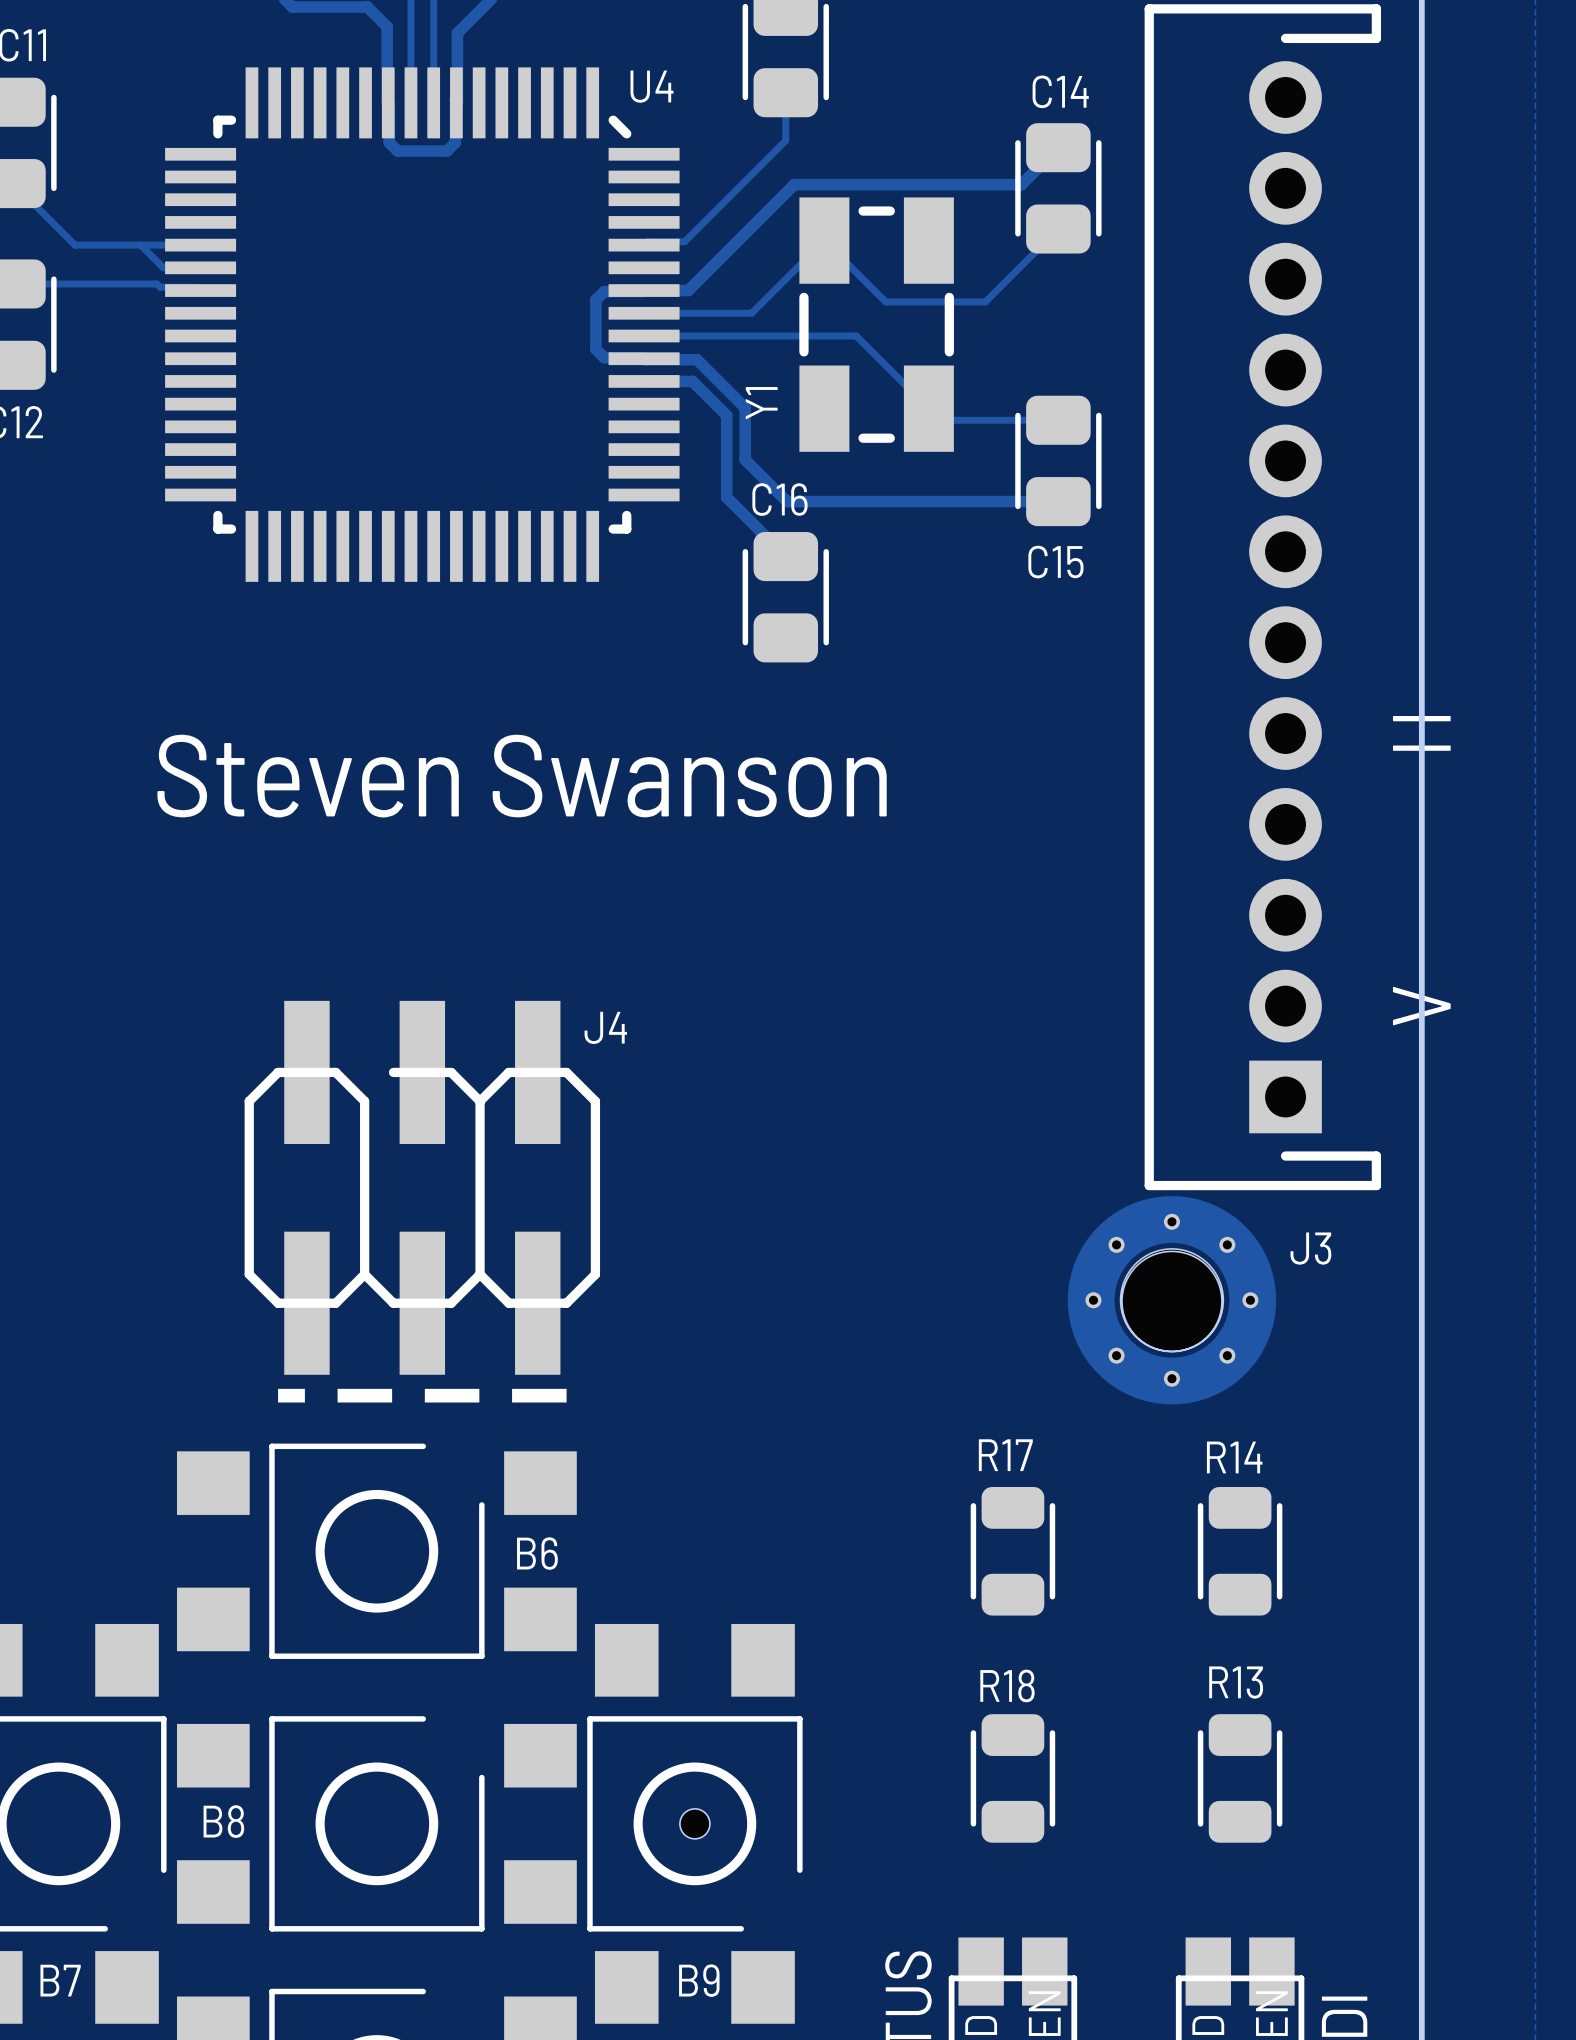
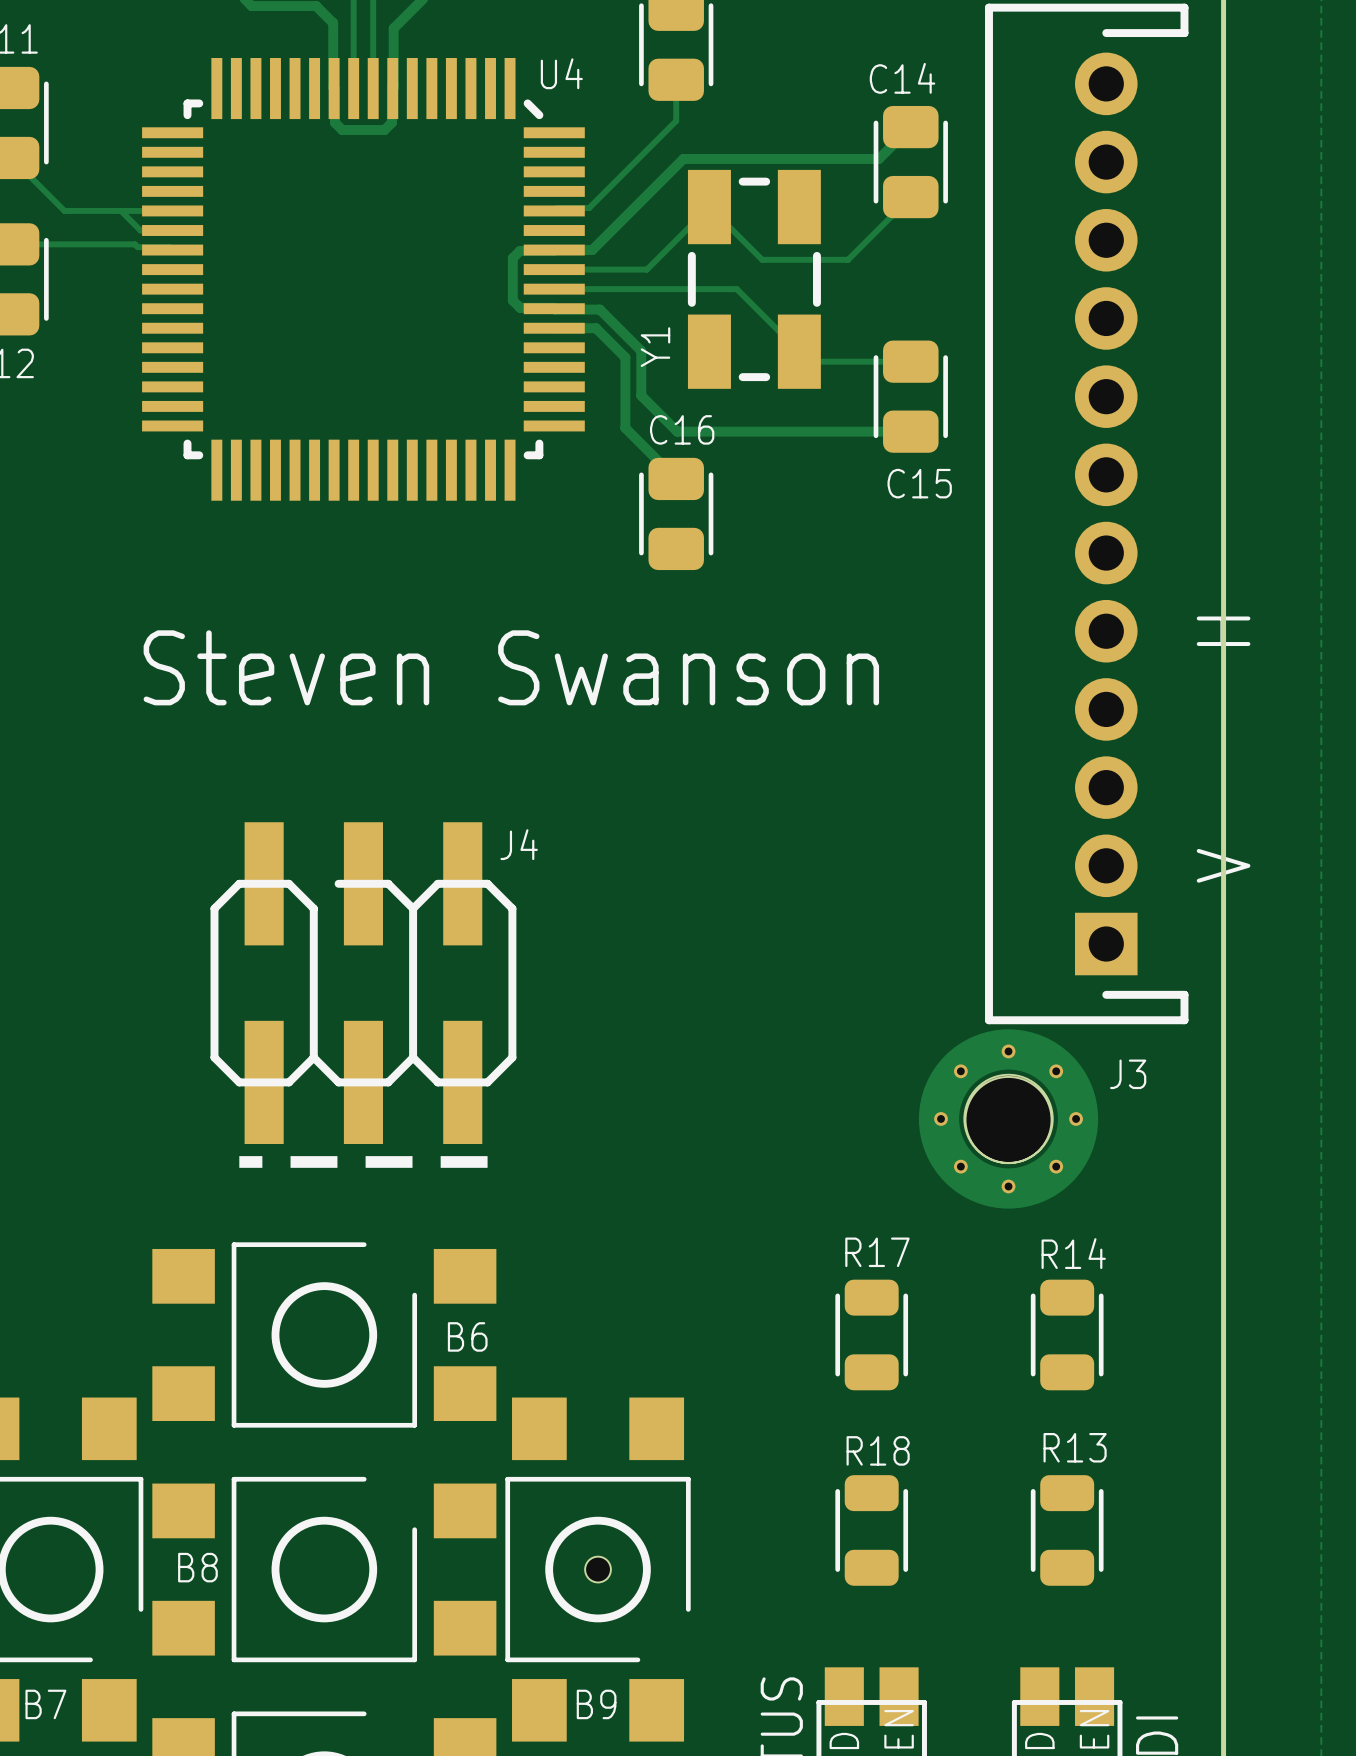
J4 position: (422, 1201) -> (363, 995)

